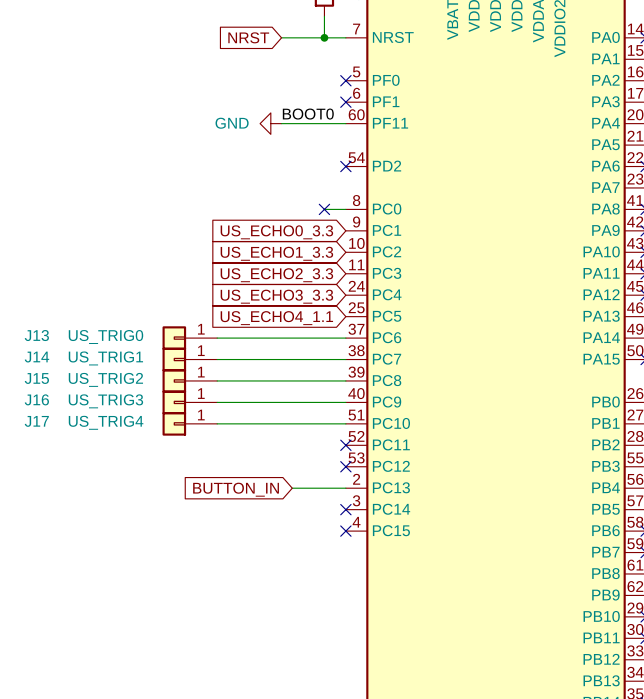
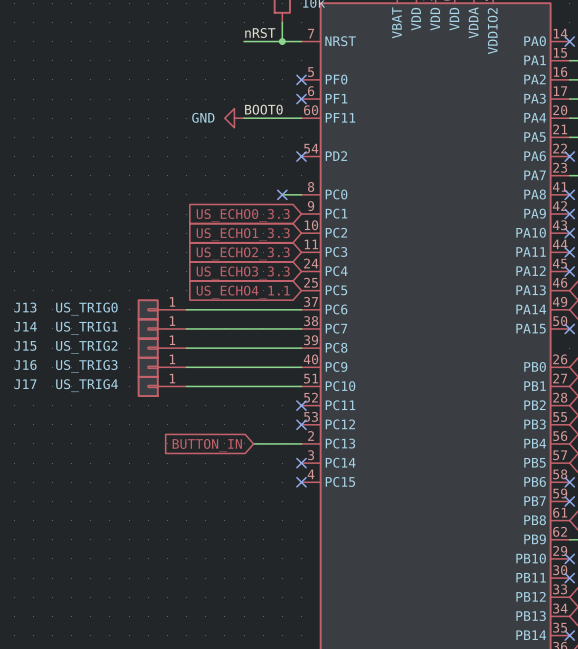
label: none -> nRST (260, 33)
global label: NRST (248, 37) -> none

